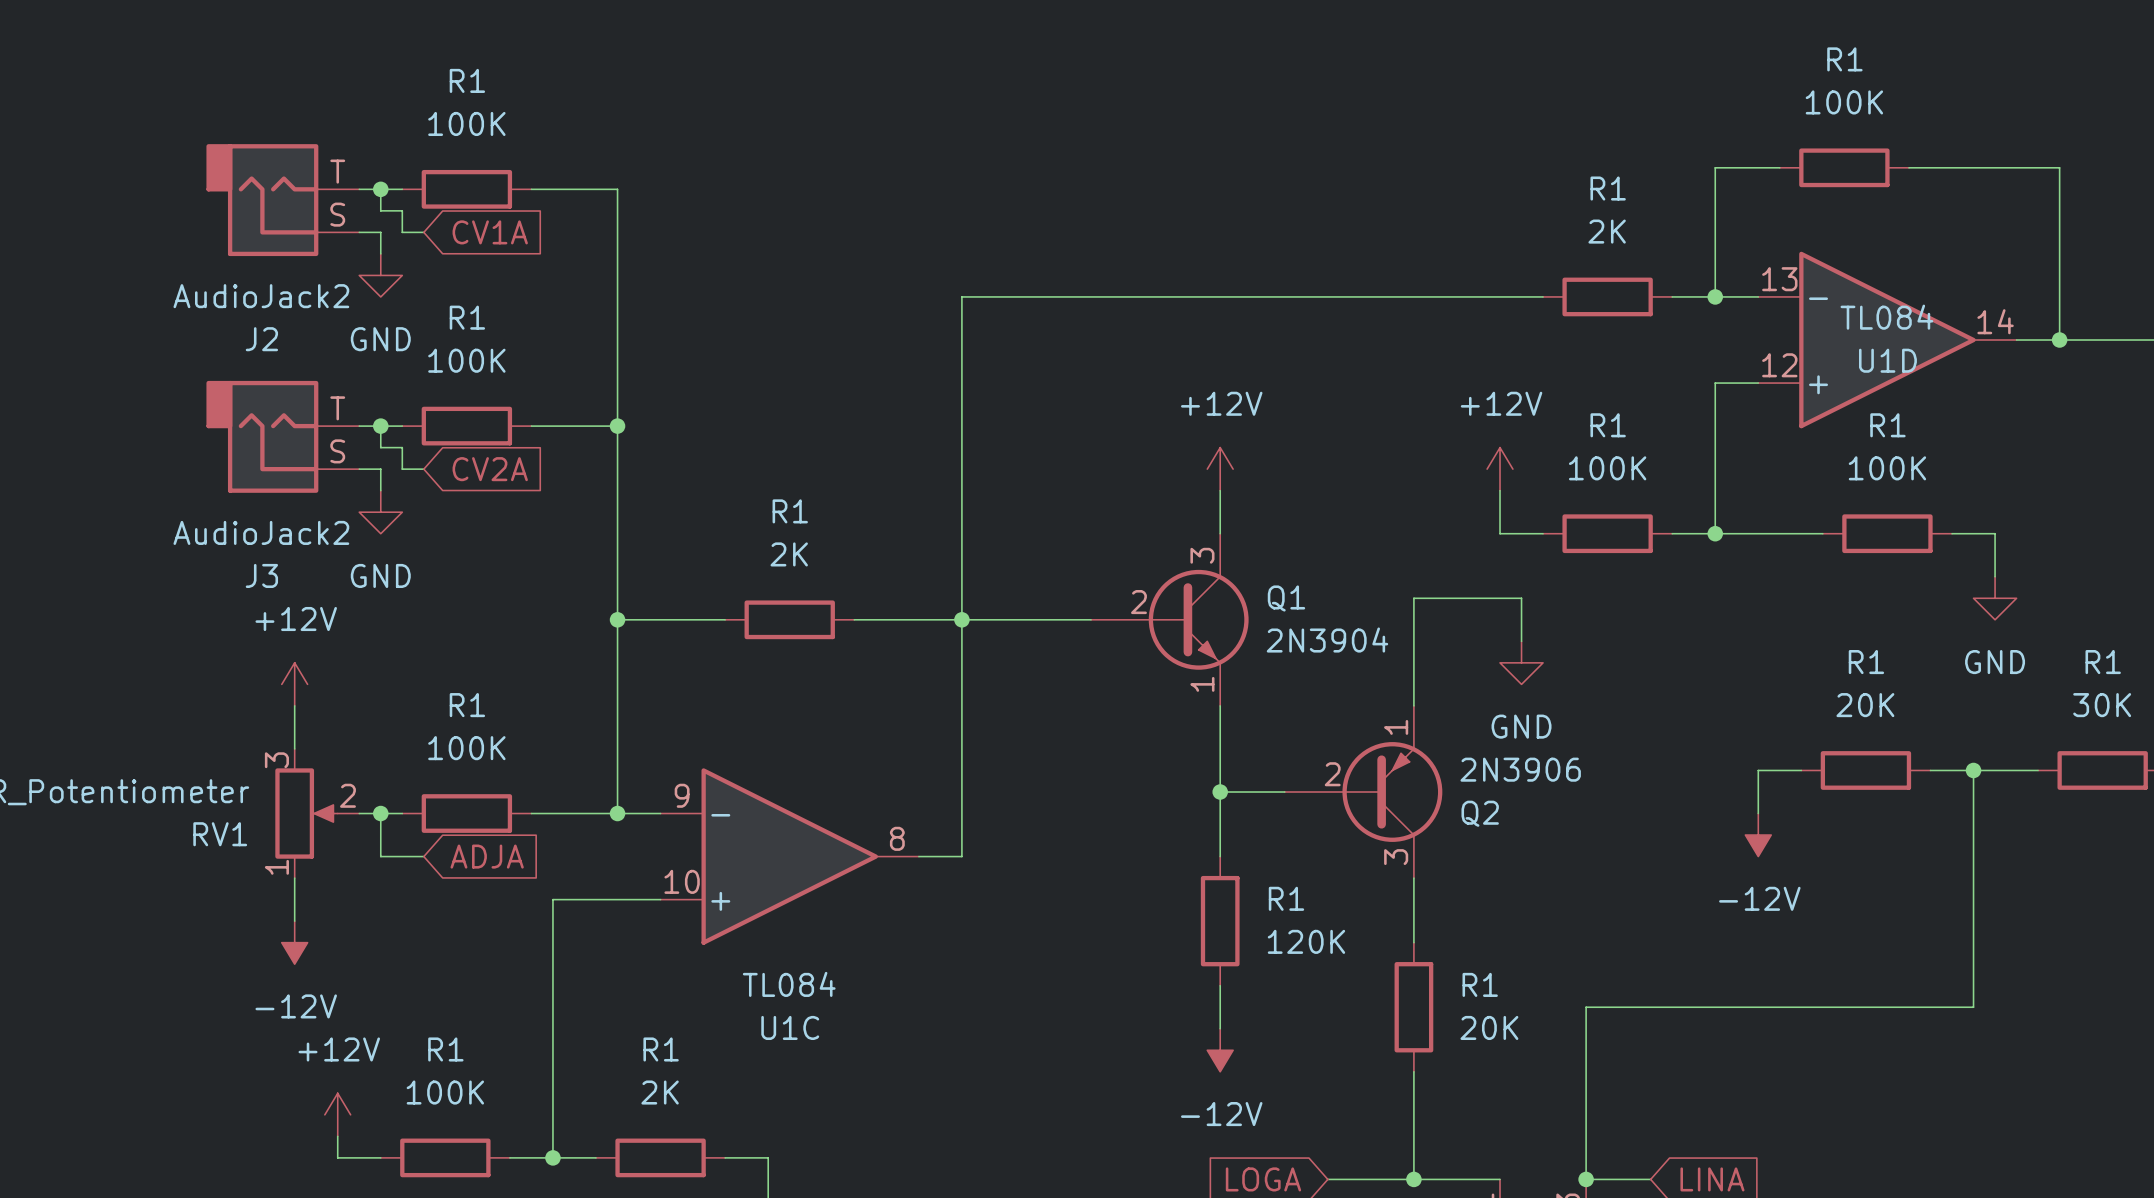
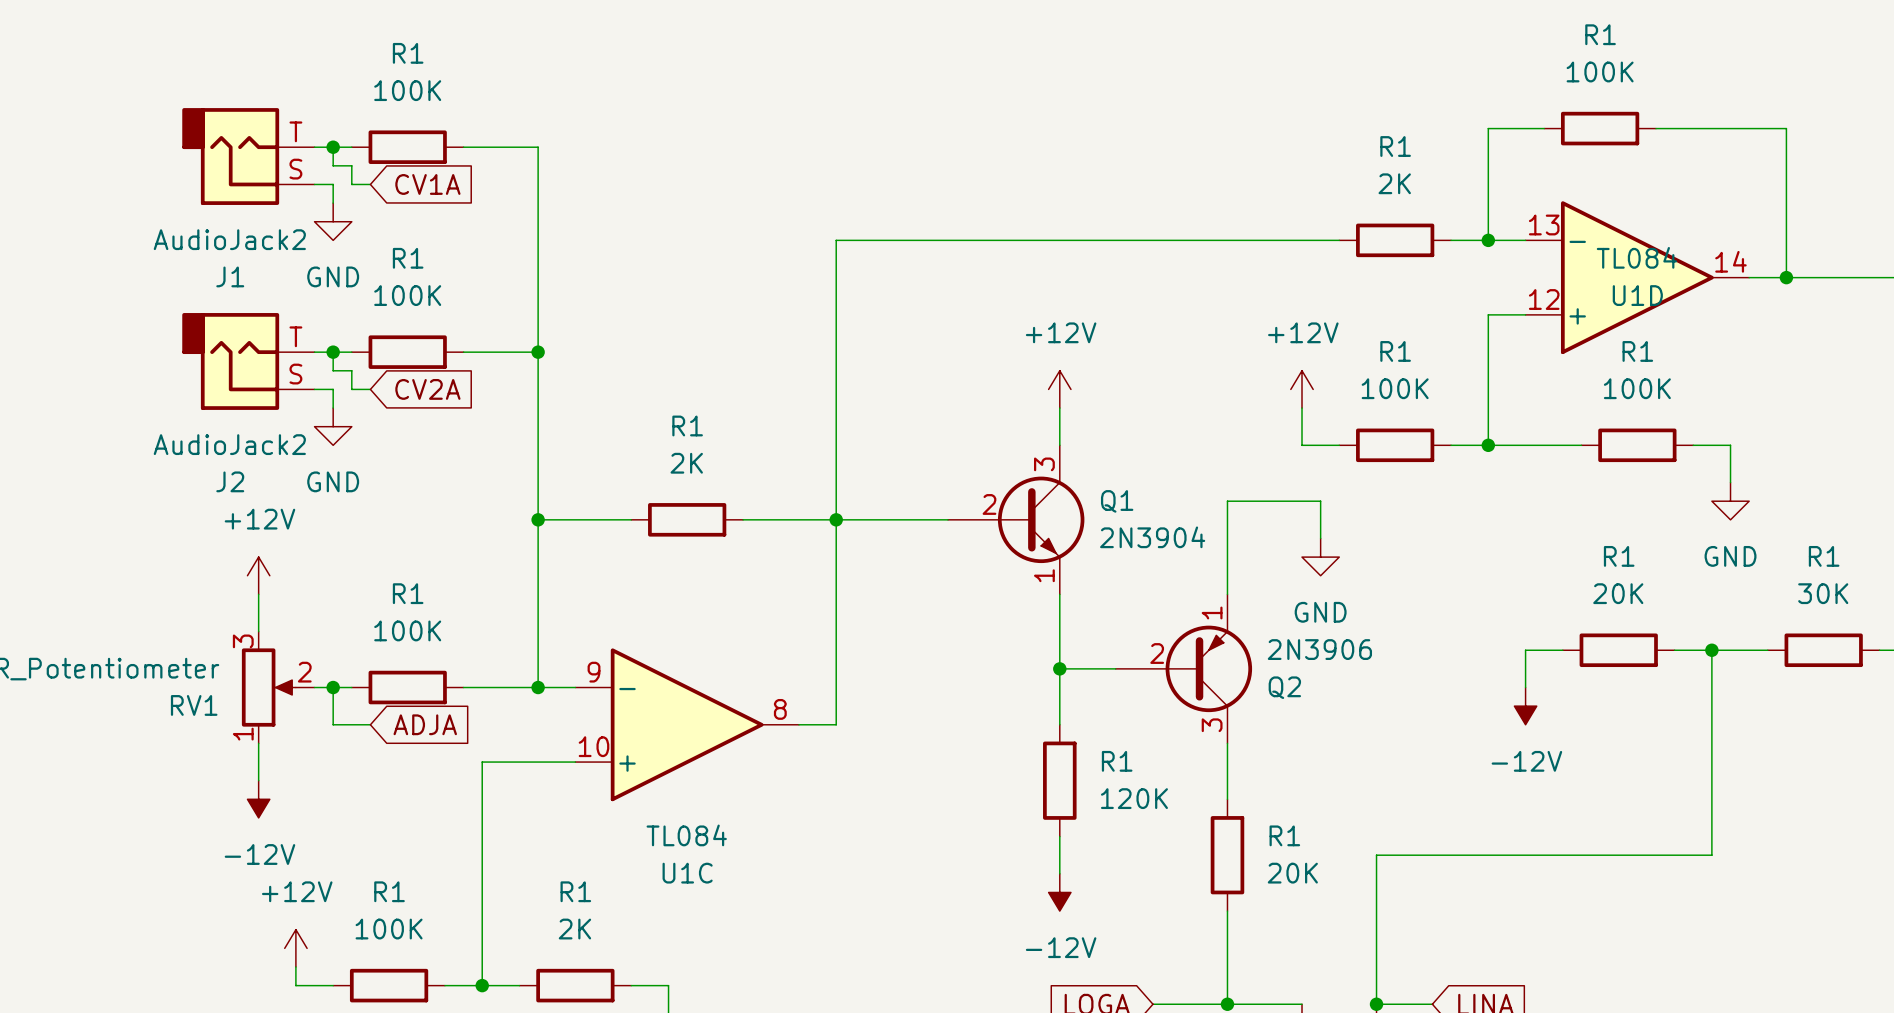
J2 name: J2 (261, 339) -> J1 (230, 276)
J3 name: J3 (261, 575) -> J2 (230, 481)

